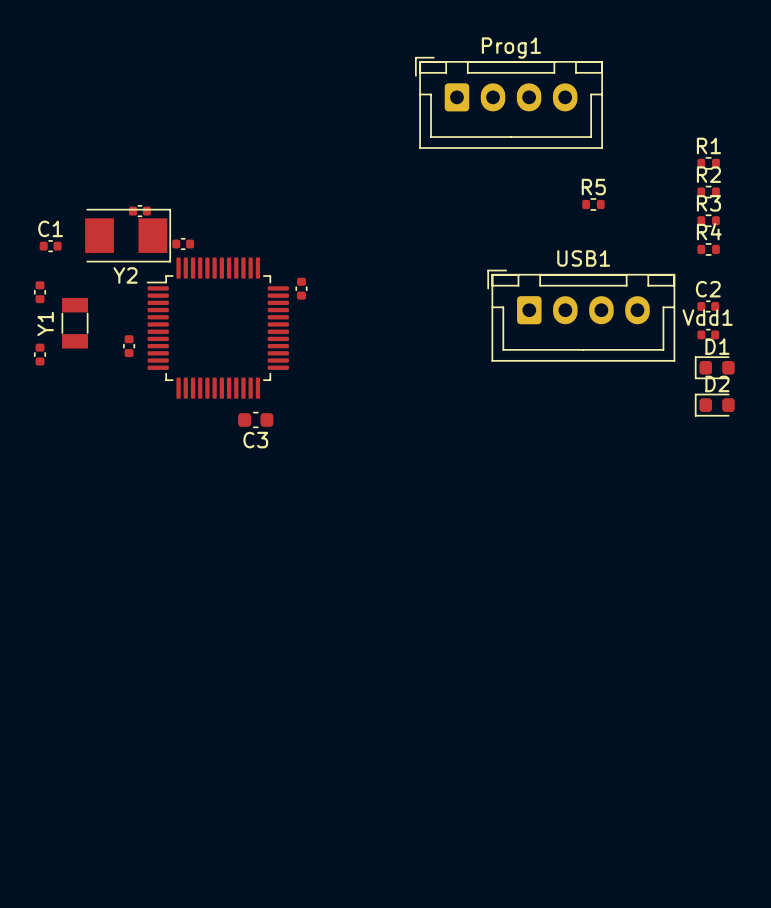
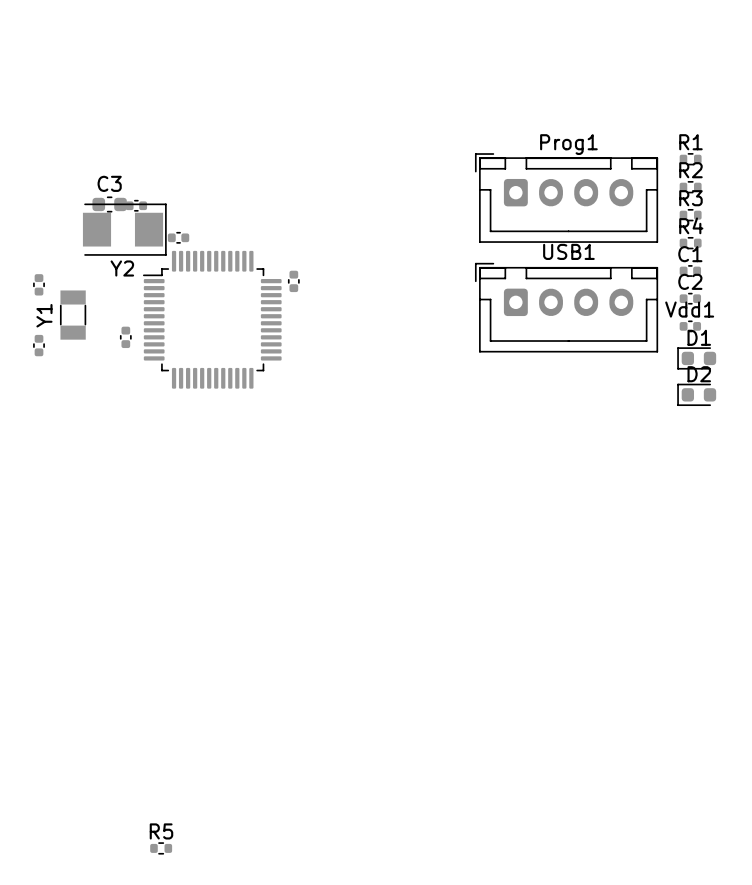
Prog1 position: (508, 102) -> (566, 198)
R5 position: (593, 204) -> (161, 848)
C1 position: (50, 246) -> (690, 270)
C3 position: (255, 419) -> (109, 204)
C3 name position: C3 (255, 440) -> C3 (109, 183)

